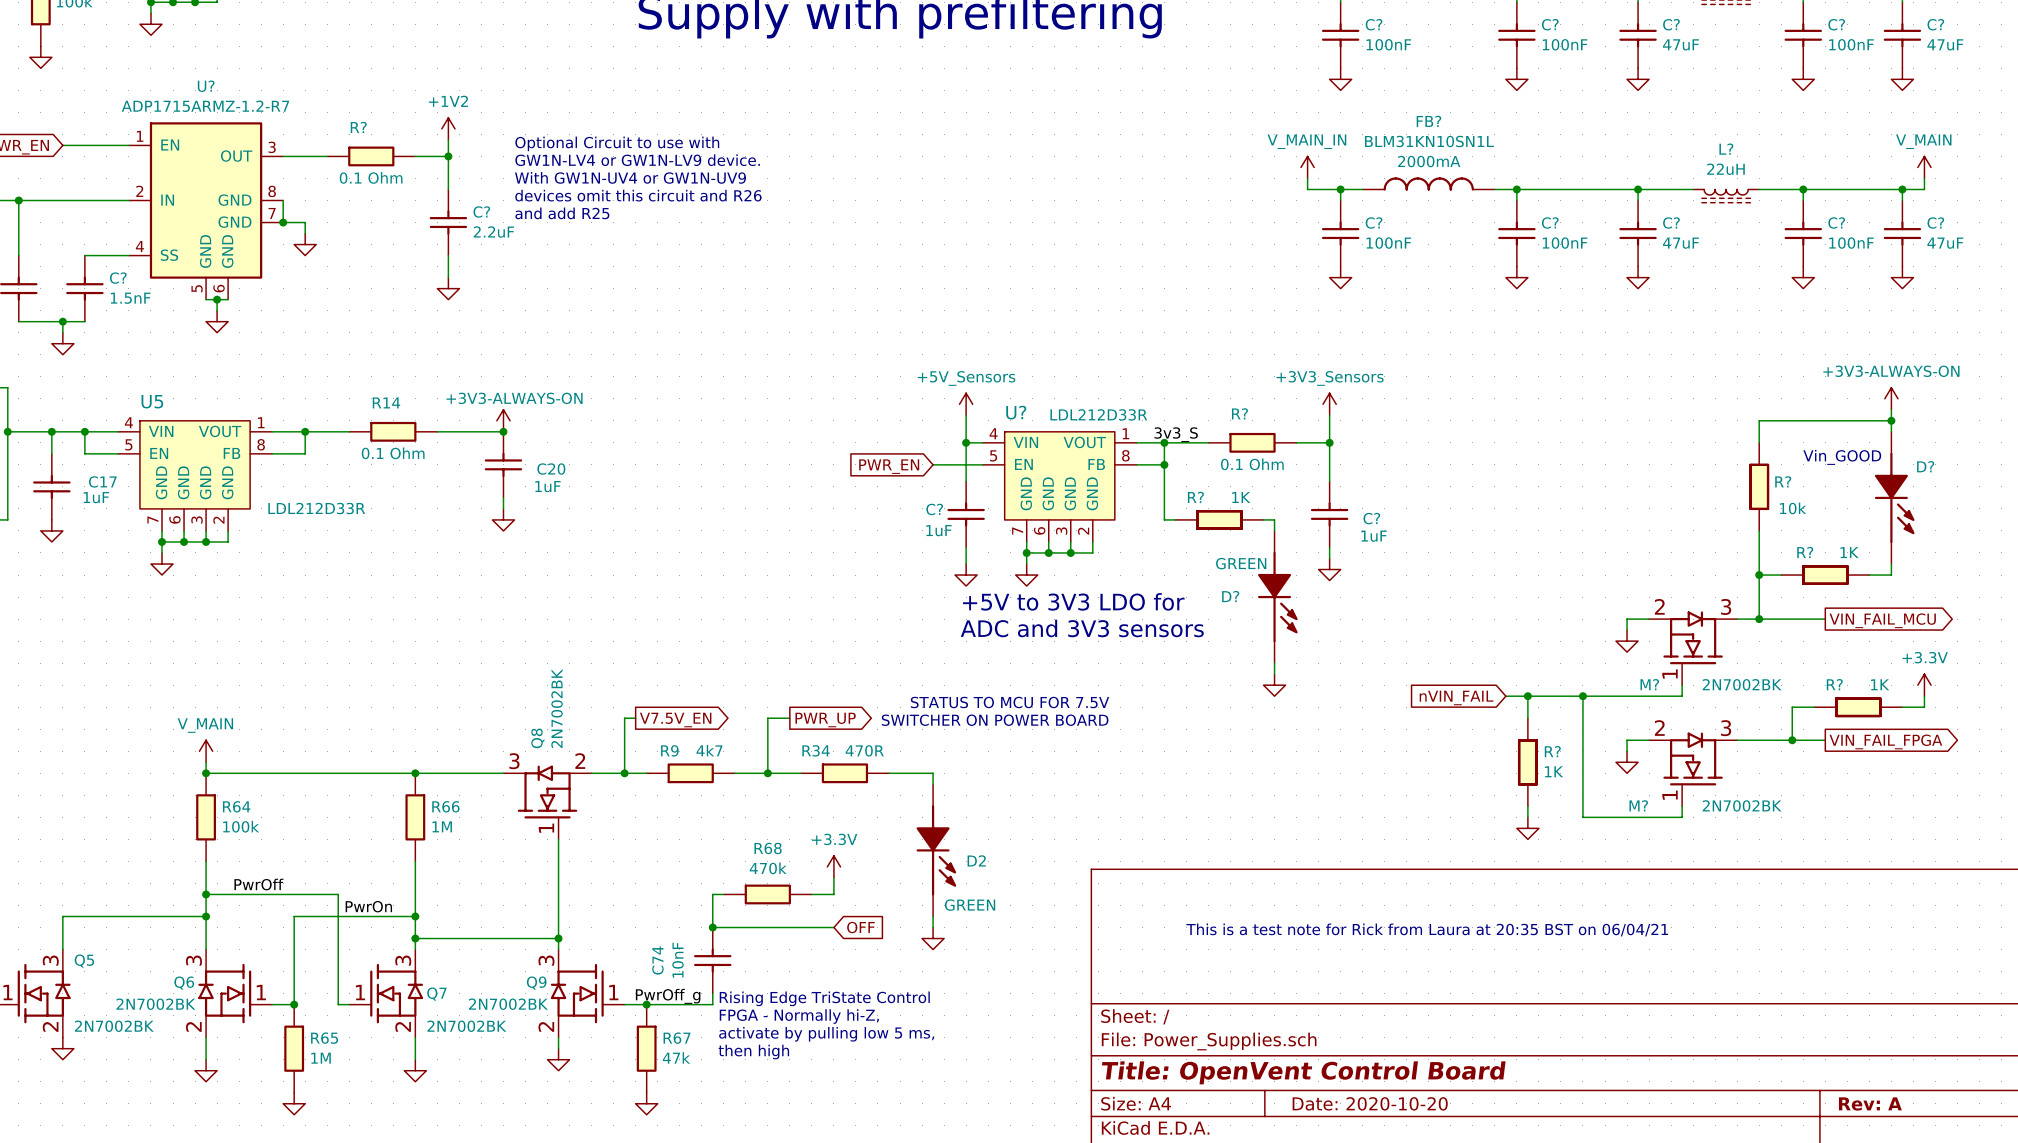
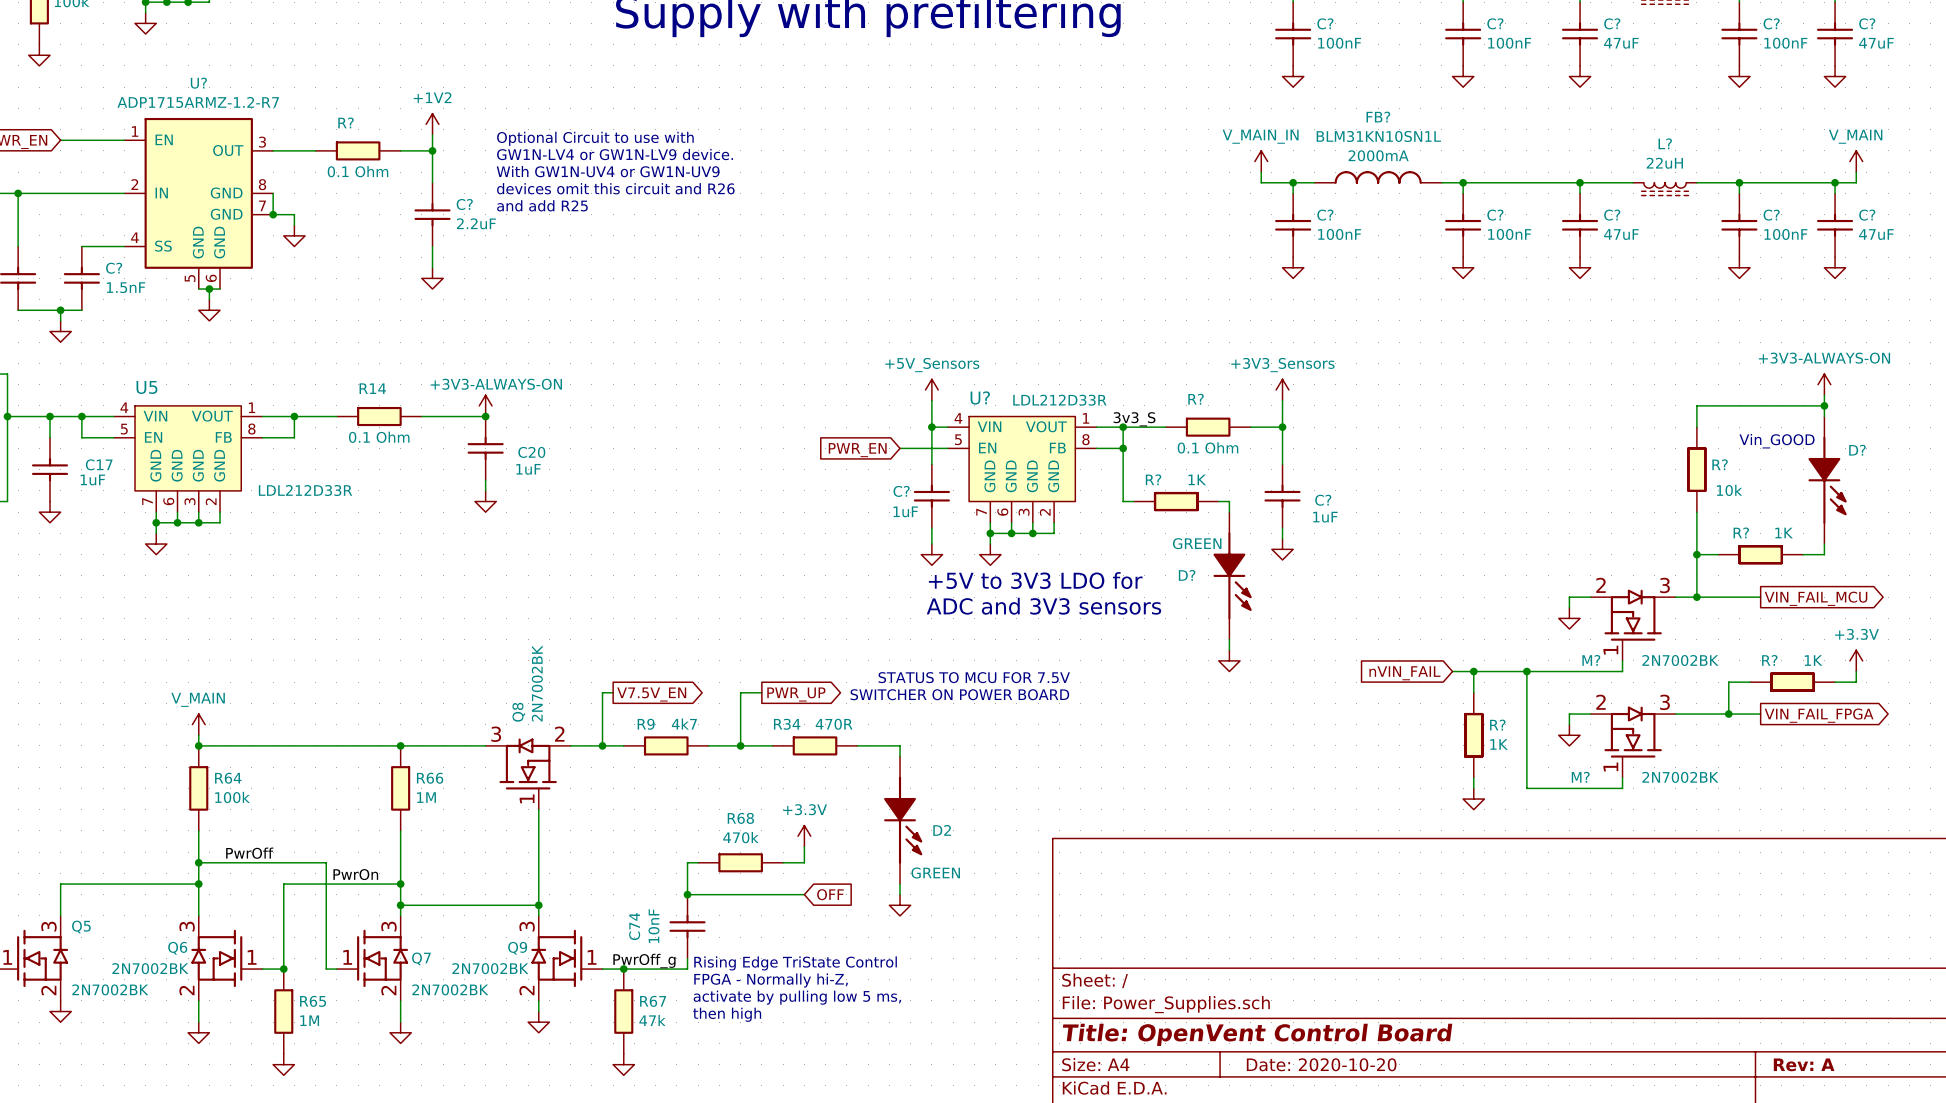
text: This is a test note for Rick from Laura at 20:35 BST on 06/04/21 (1427, 929) -> none

